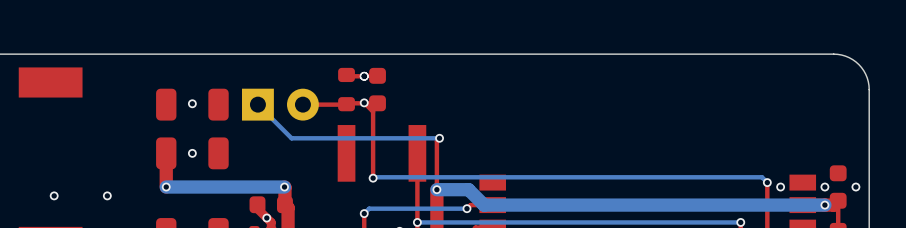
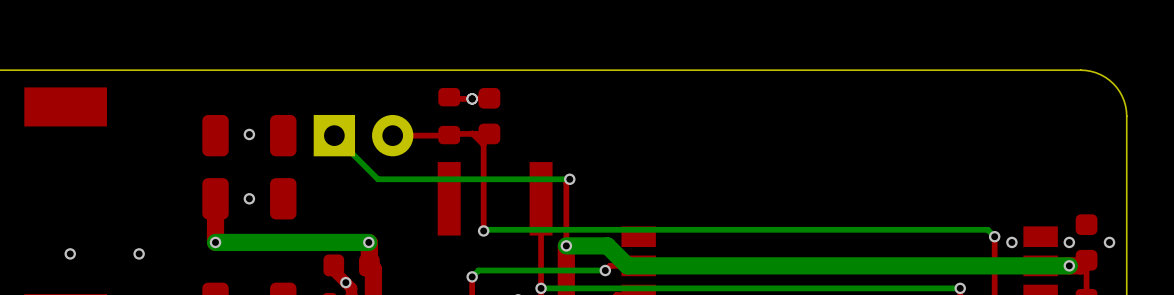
via: (364, 102) -> none

